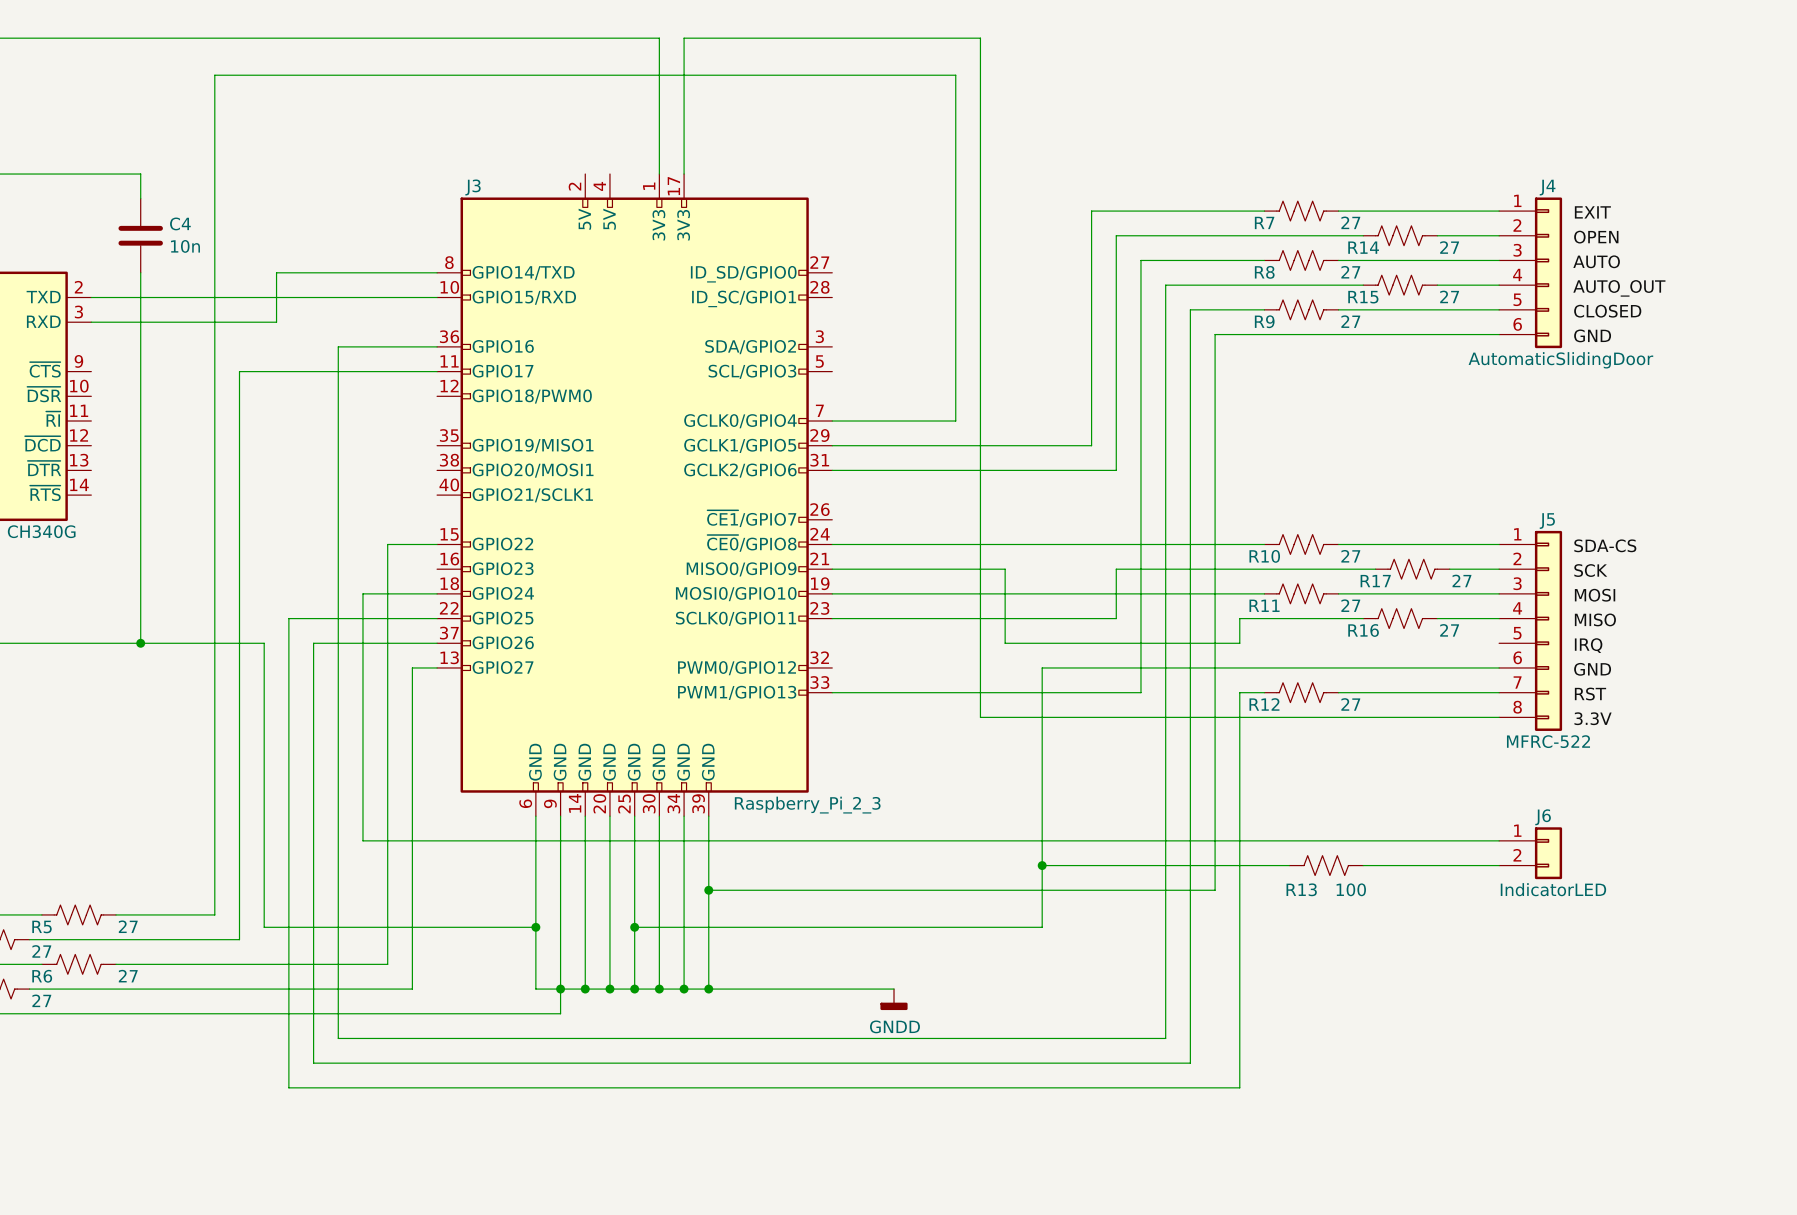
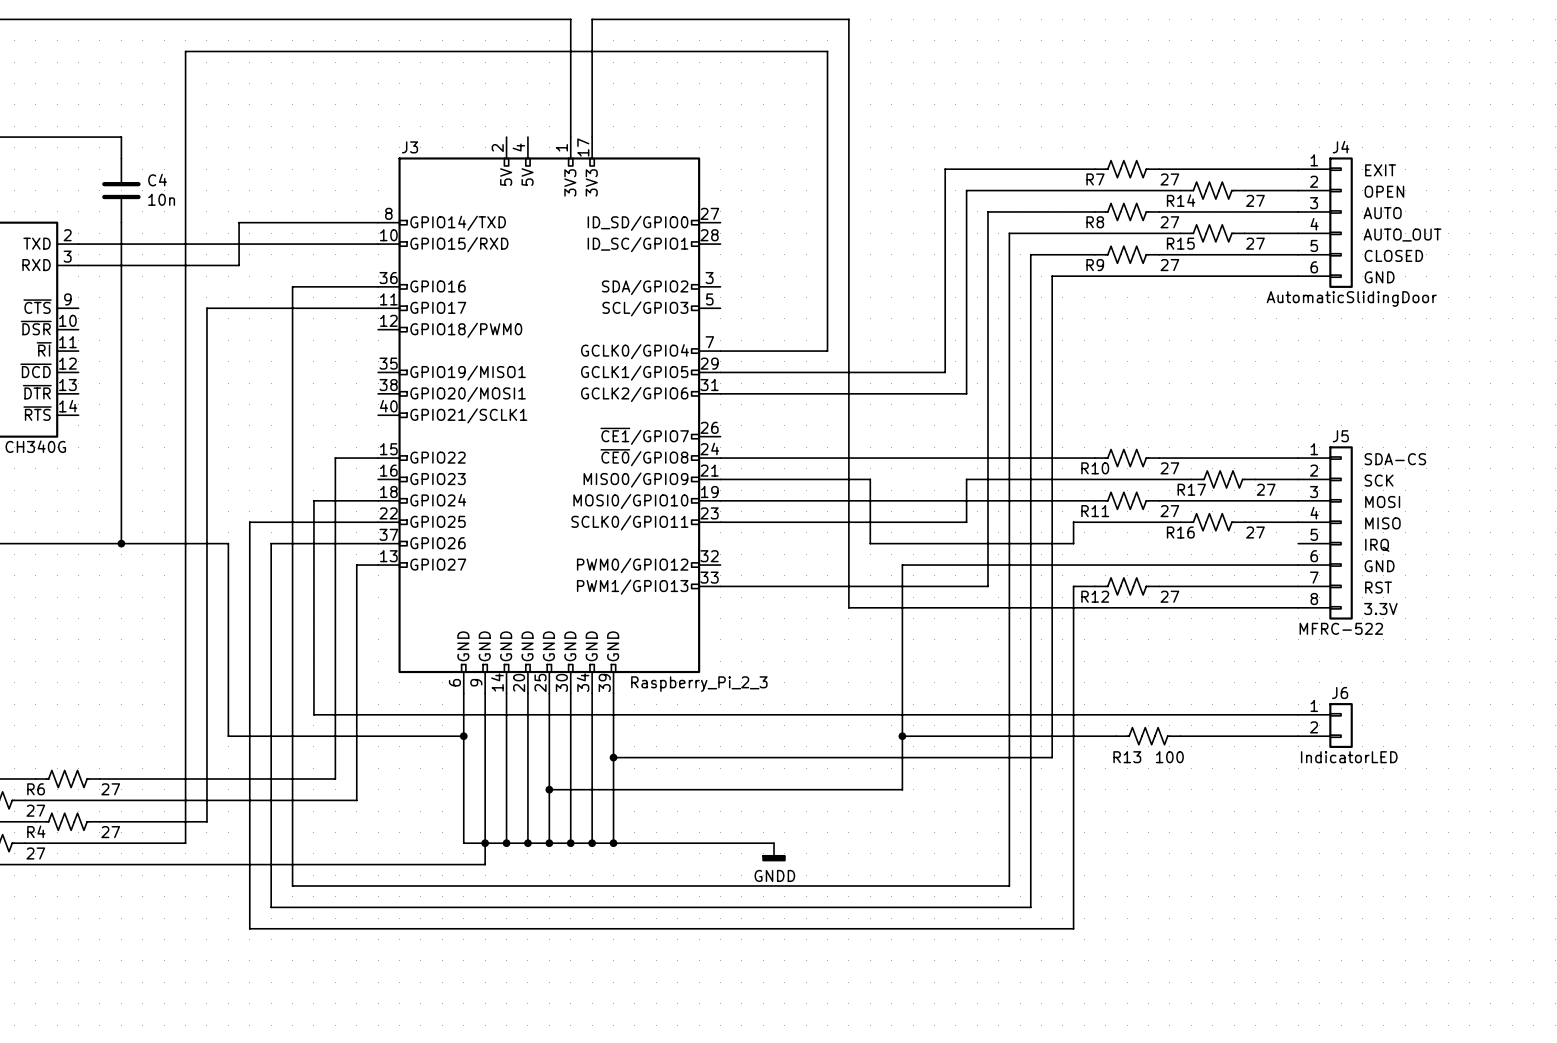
wire: (264, 865) (264, 927) (535, 927) -> (228, 736) (463, 736)
junction: none -> (463, 736)
wire: (387, 914) (387, 964) (239, 964) -> (335, 779) (185, 779) (185, 843)
R5 name: R5 (42, 926) -> R6 (36, 789)
junction: (535, 927) -> none
wire: (412, 939) (412, 989) (214, 989) -> (356, 800) (206, 800) (206, 821)
R6 name: R6 (42, 976) -> R4 (36, 831)

